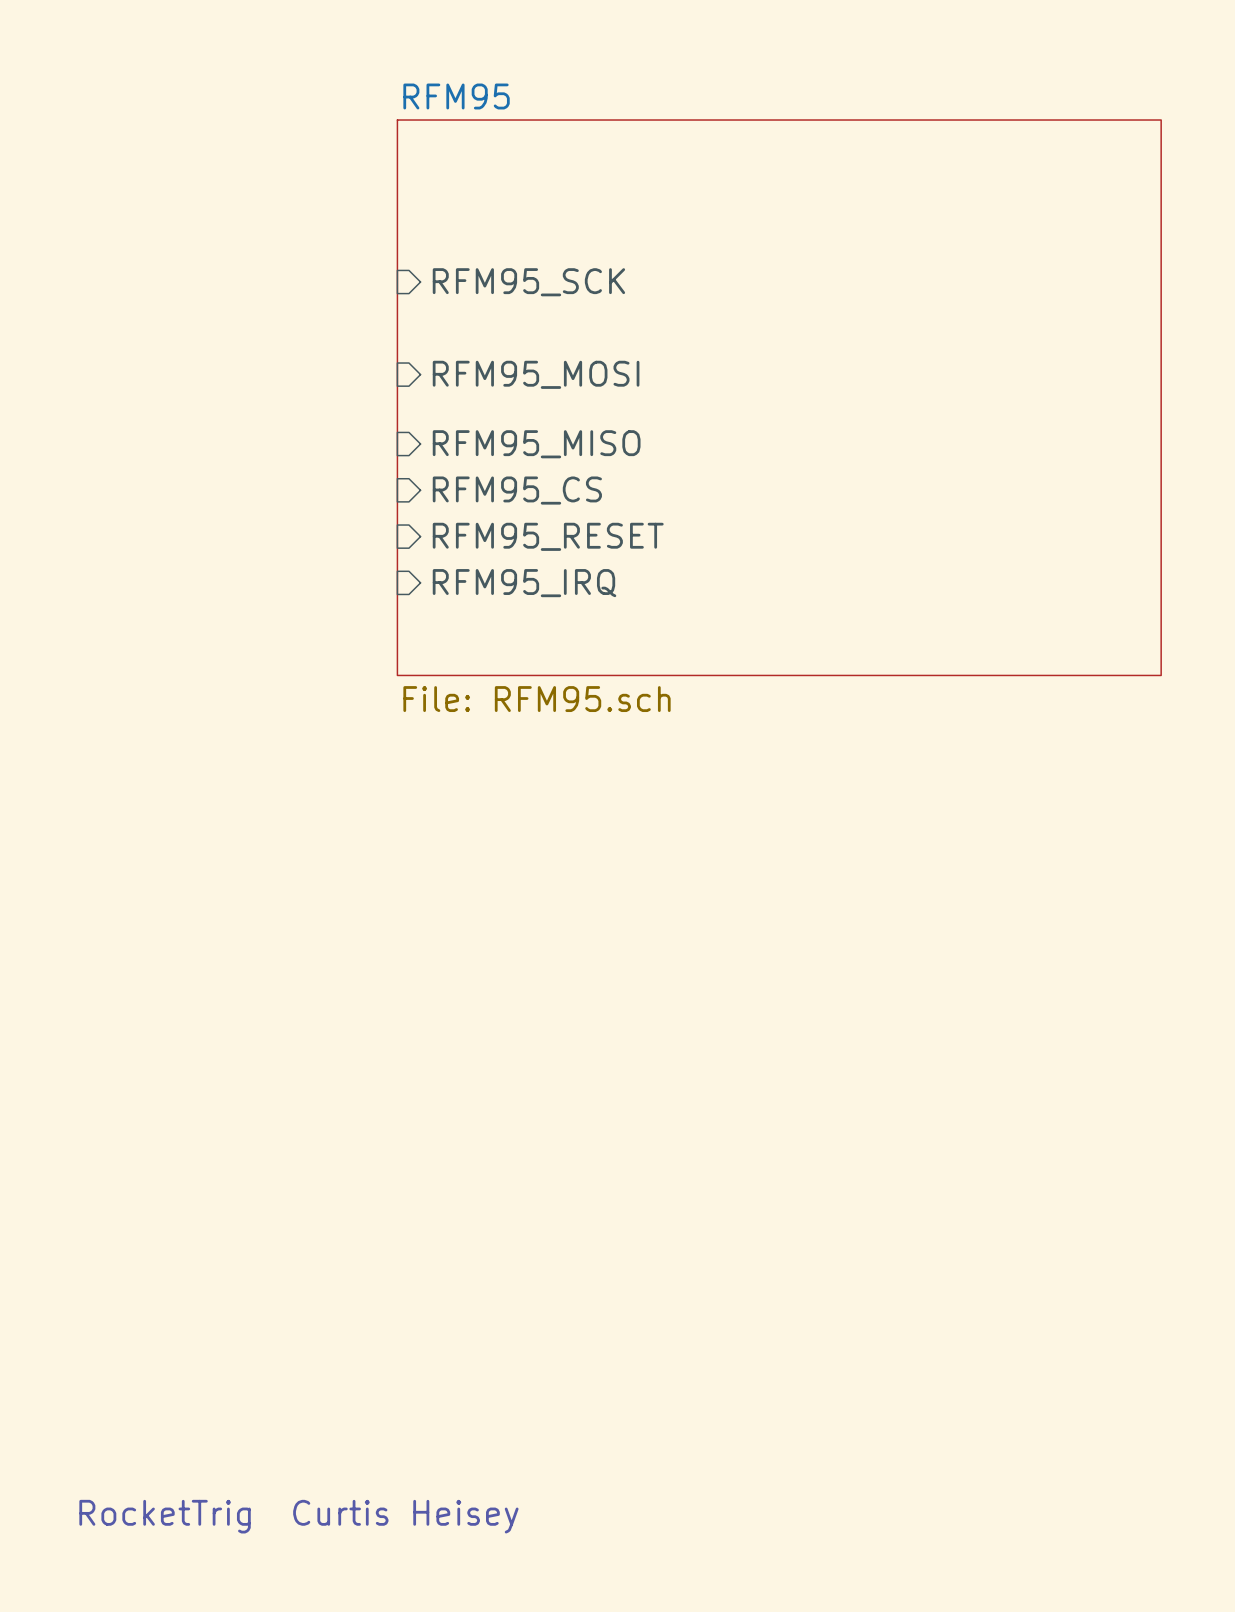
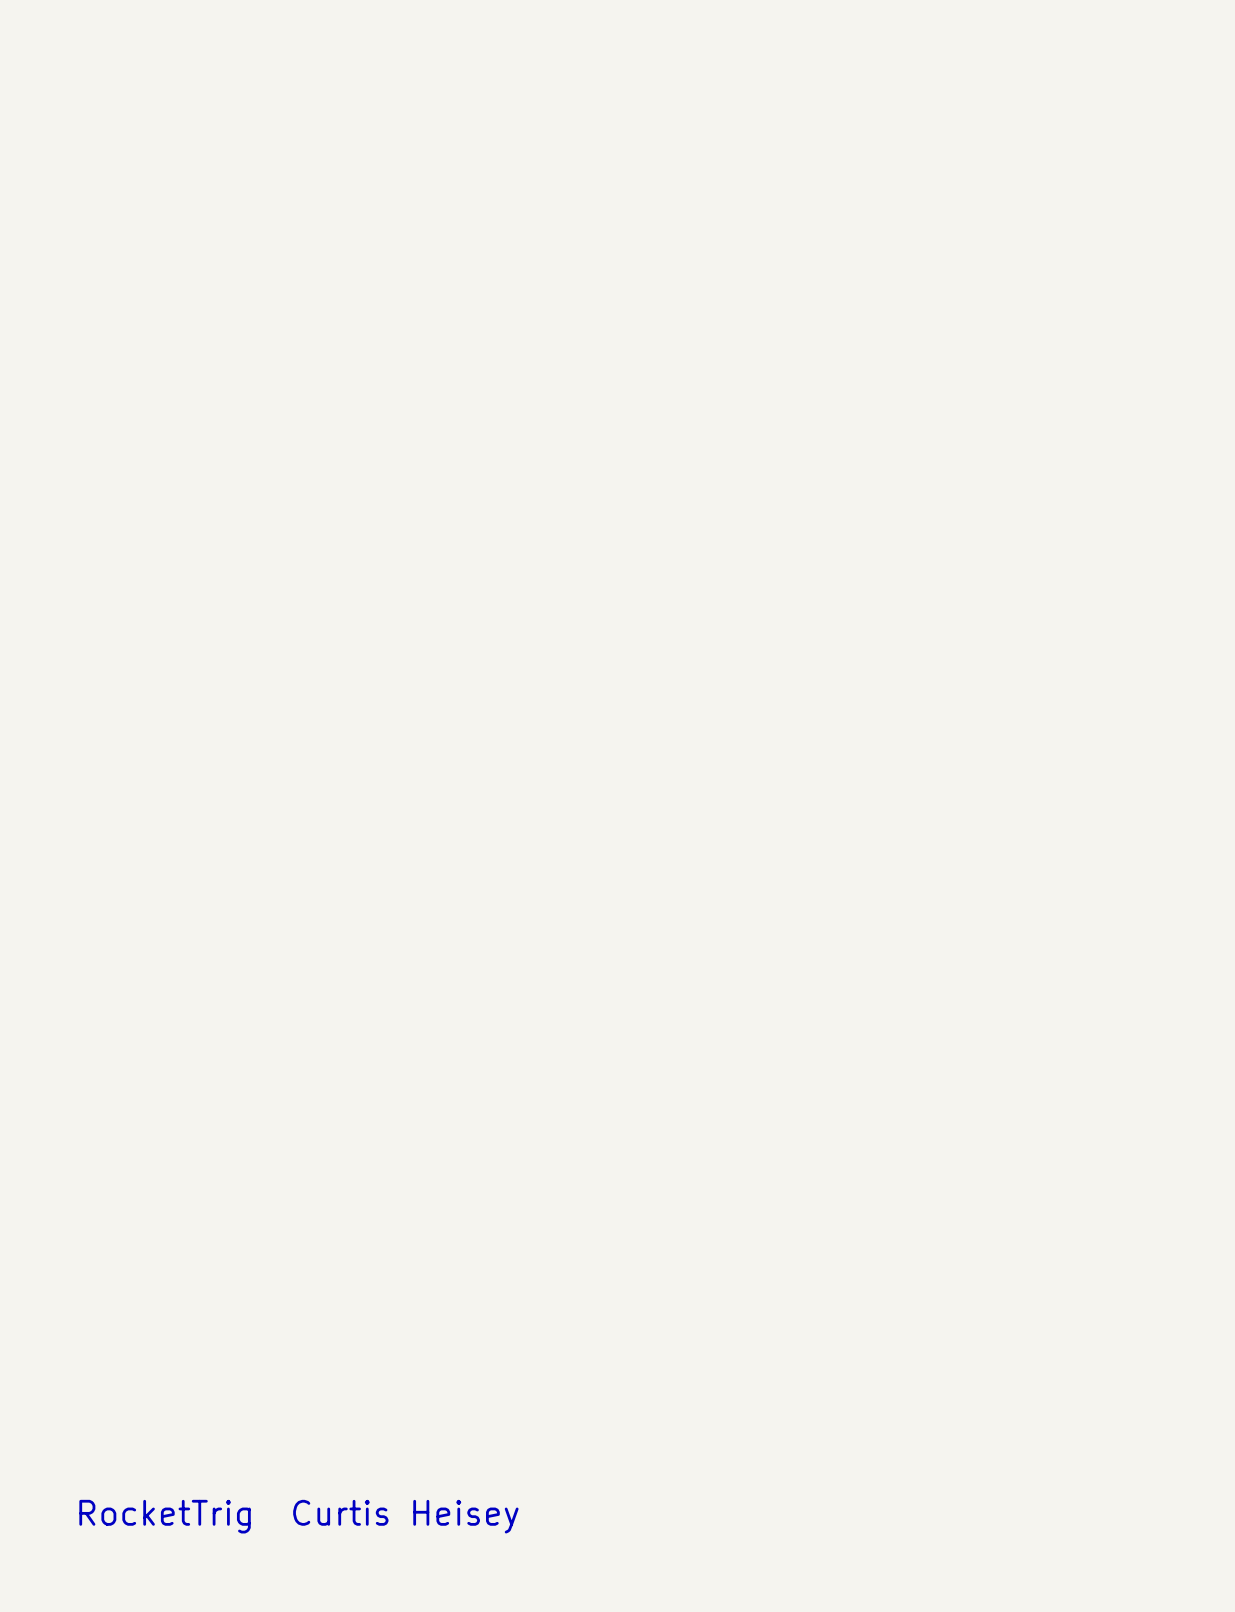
sheet pin: RFM95_SCK (528, 282) -> none
sheet pin: RFM95_MOSI (536, 374) -> none
sheet RFM95: File: RFM95.sch (779, 397) -> none
sheet pin: RFM95_MISO (536, 444) -> none
sheet pin: RFM95_CS (517, 490) -> none
sheet pin: RFM95_RESET (548, 536) -> none
sheet pin: RFM95_IRQ (524, 583) -> none

